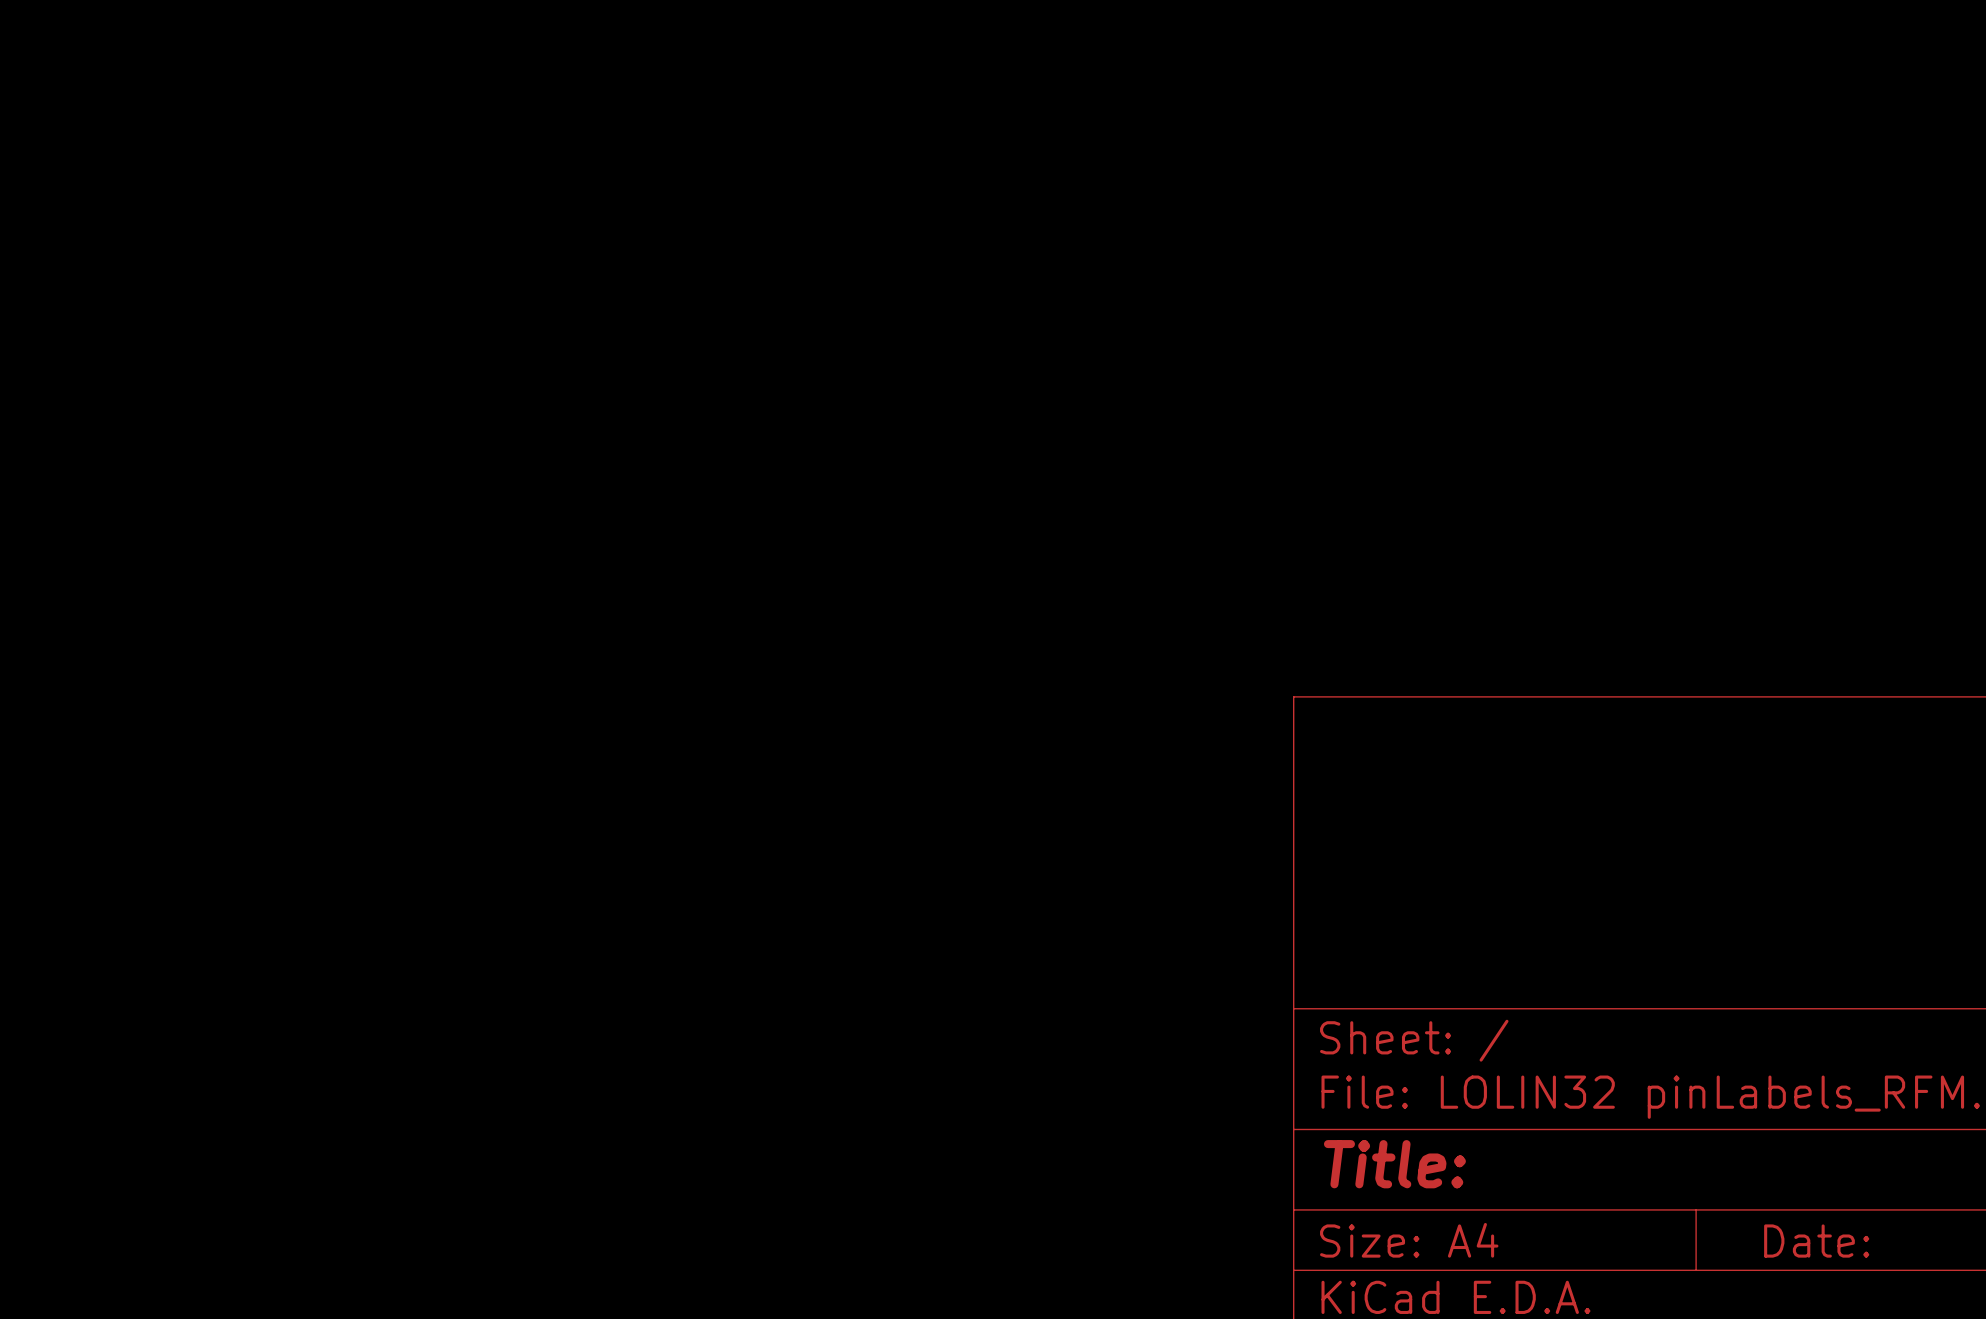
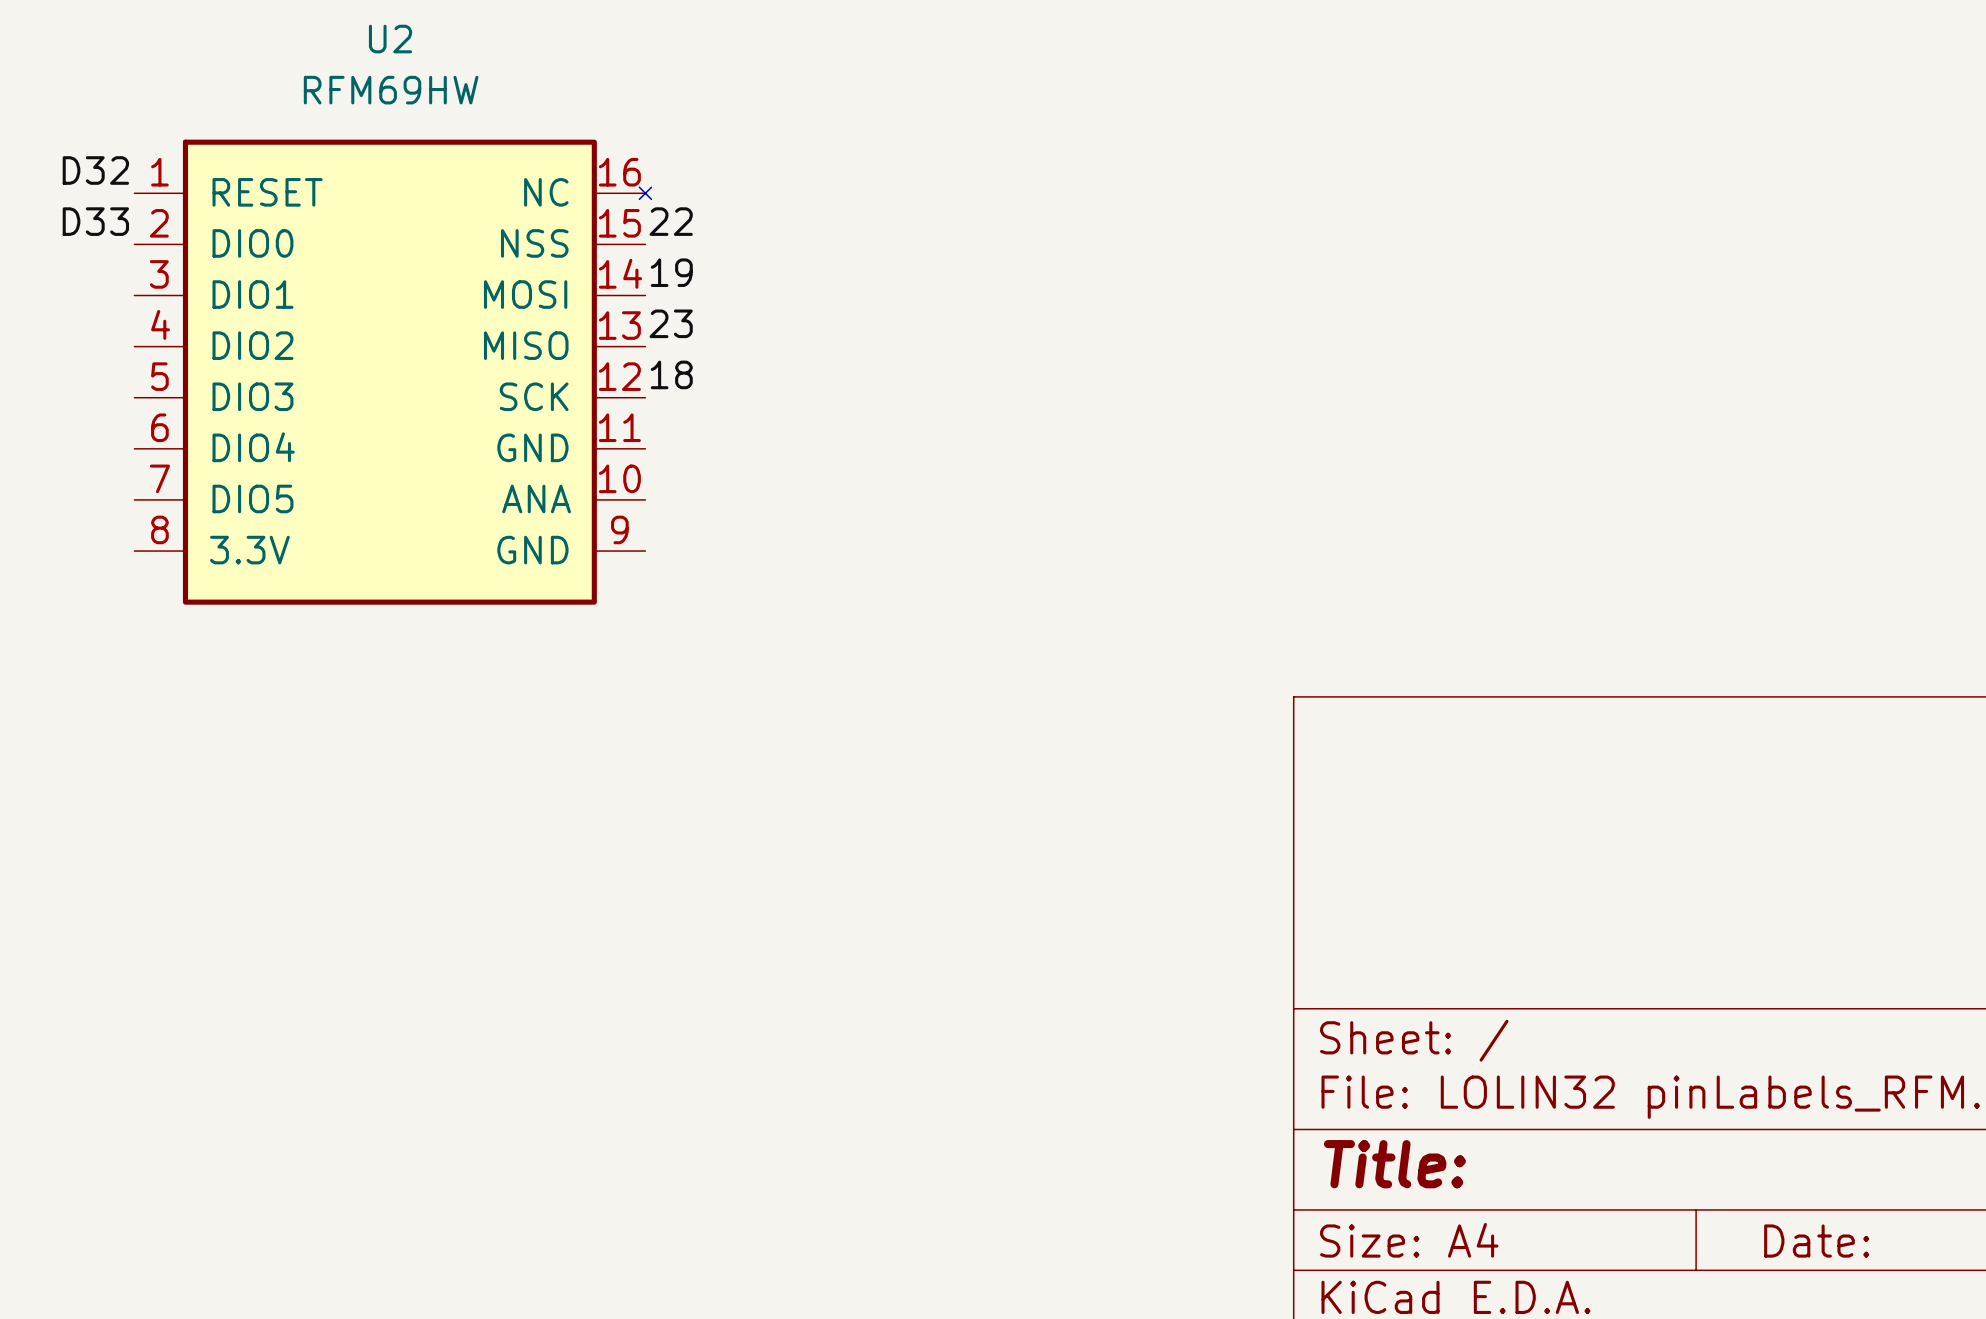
label: none -> D32 (95, 170)
label: none -> D33 (95, 221)
label: none -> 22 (671, 221)
label: none -> 19 (671, 272)
label: none -> 23 (671, 323)
U2: none -> RFM69HW (392, 372)
label: none -> 18 (671, 374)

